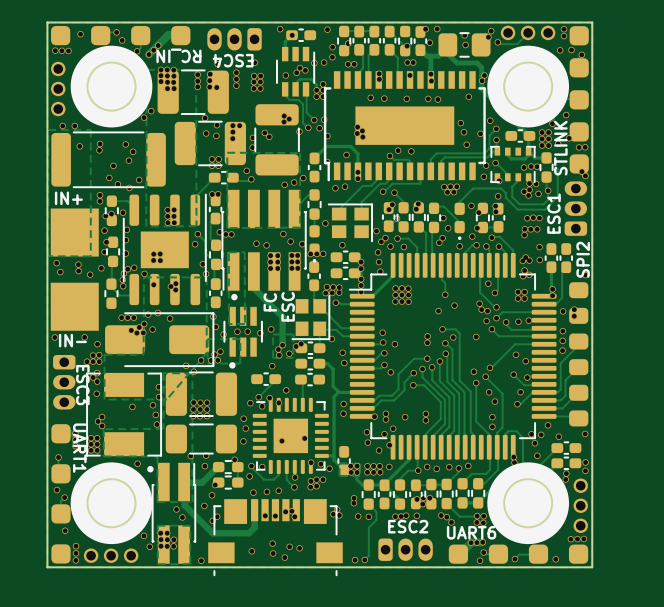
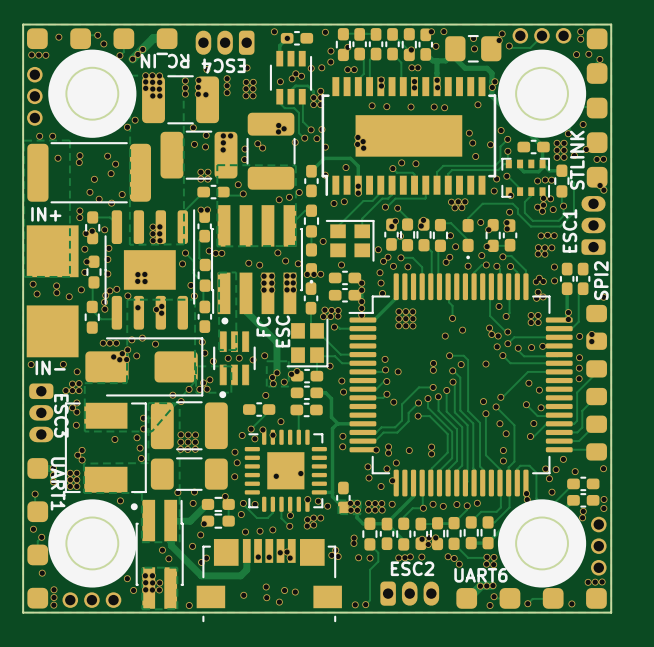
via: none -> (414, 87)
via: none -> (544, 254)

